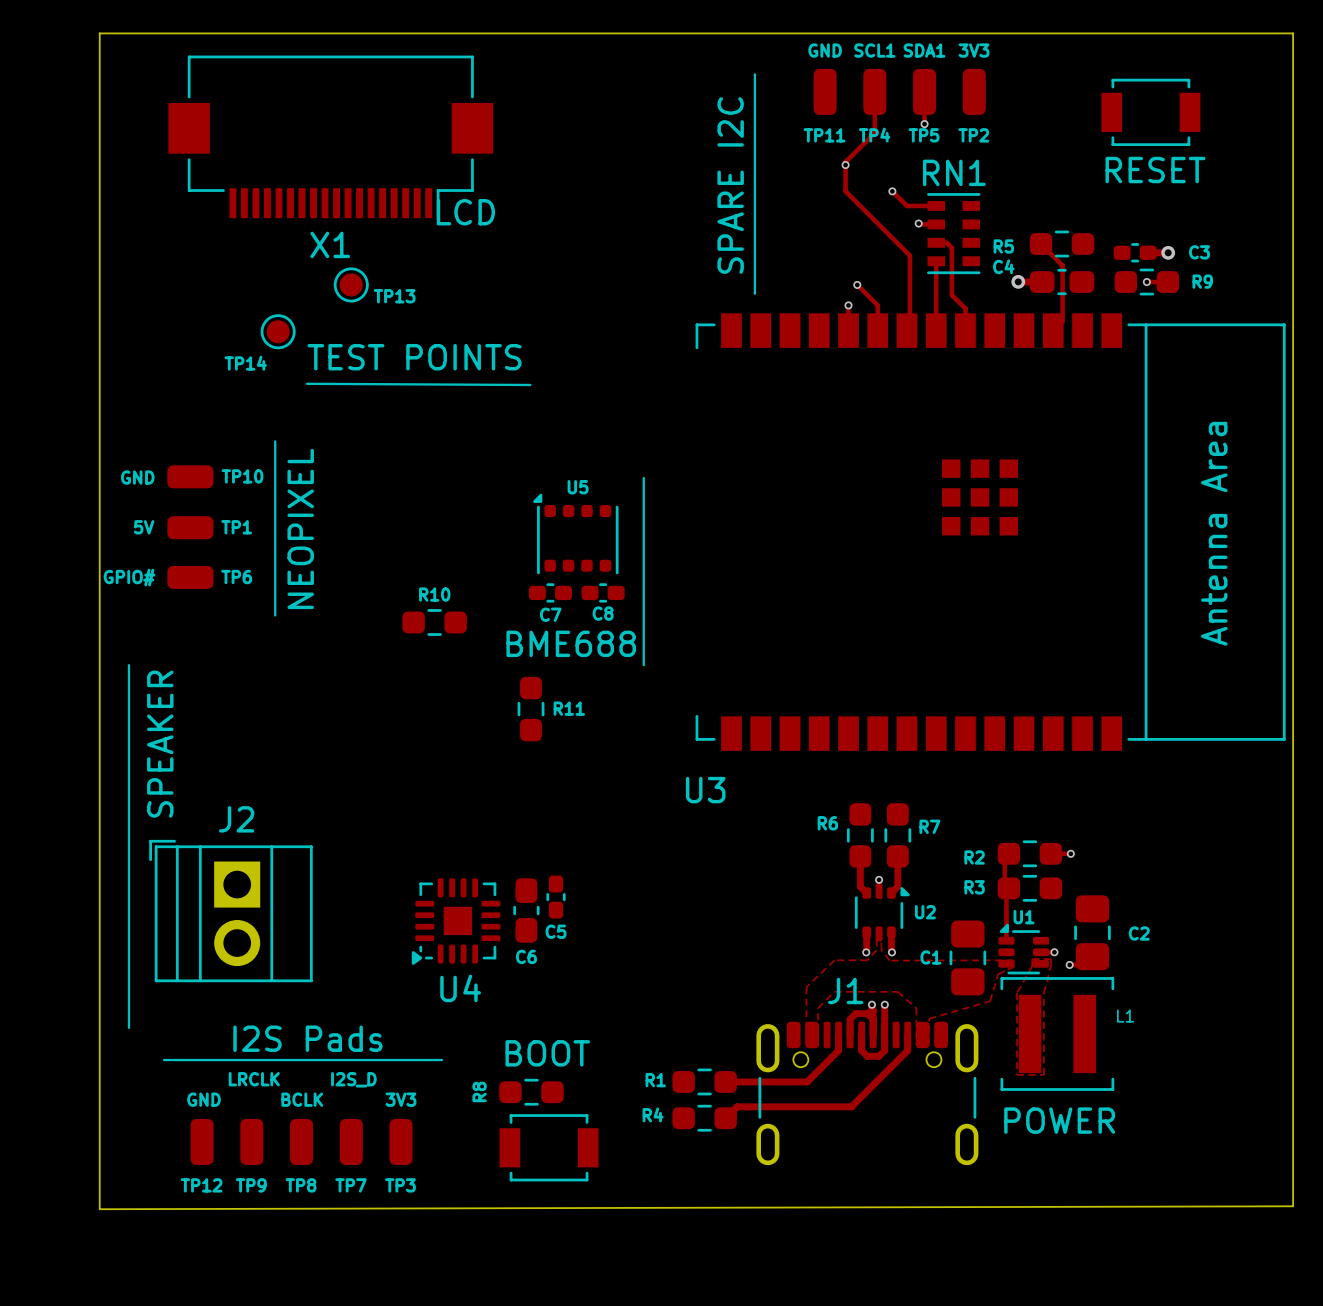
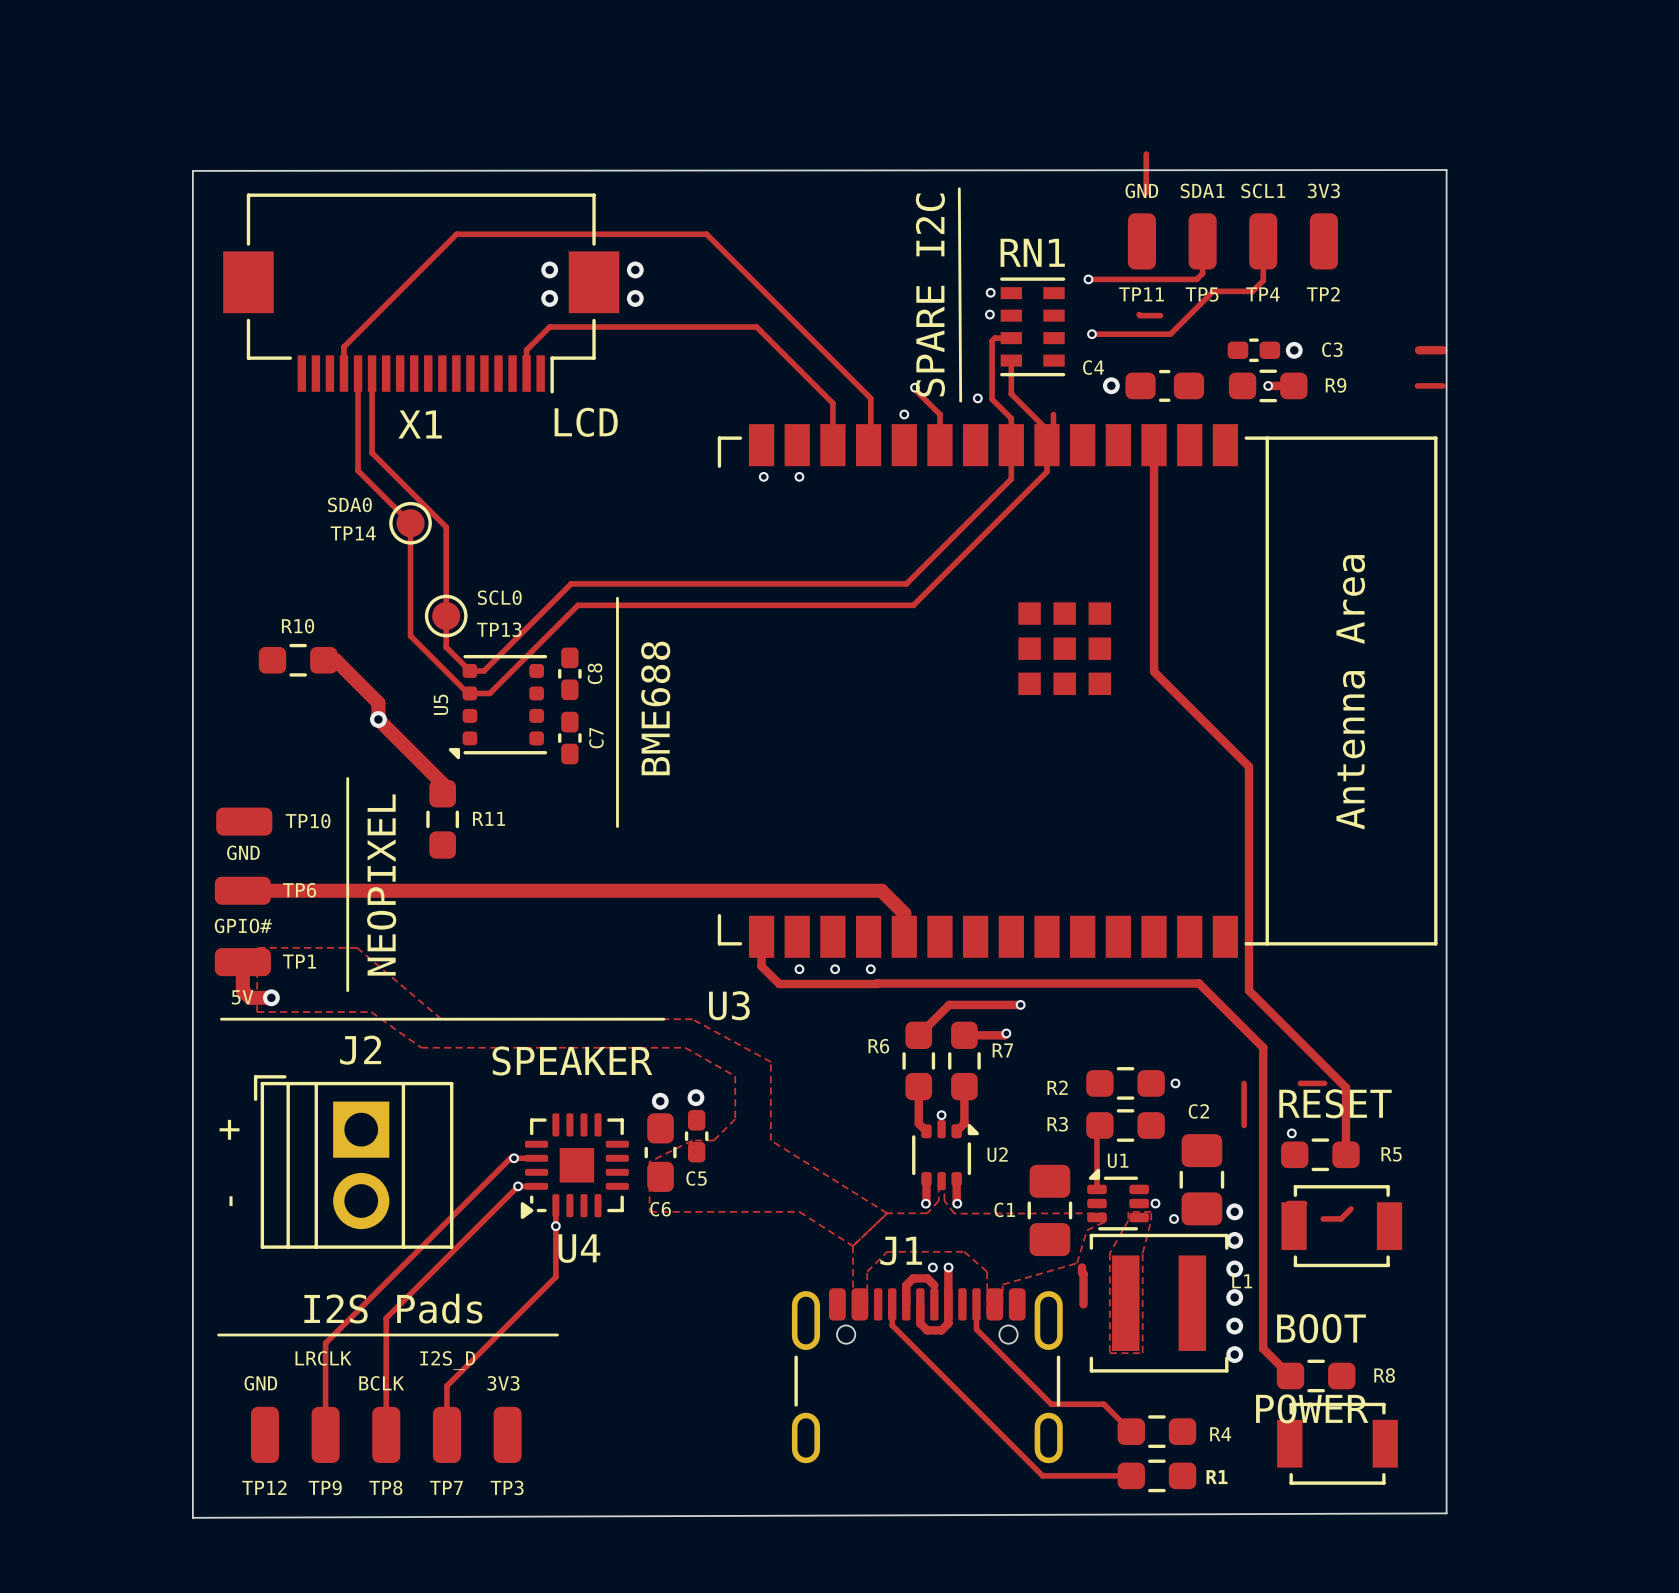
board edge: (99, 33) (1293, 33) (1293, 1206) (99, 1209) (99, 33) -> (1446, 170) (192, 170) (192, 1517) (1446, 1513) (1446, 170)
text position: GND (825, 50) -> GND (1141, 190)
text position: SCL1 (874, 50) -> SCL1 (1263, 190)
text position: SDA1 (924, 50) -> SDA1 (1202, 190)
text position: 3V3 (974, 50) -> 3V3 (1323, 190)
line: (754, 74) (754, 293) -> none
TP11 position: (825, 91) -> (1141, 241)
track: (874, 91) (874, 132) (845, 162) (845, 191) (909, 255) (909, 327) (907, 330) -> none
TP4 position: (874, 91) -> (1263, 241)
TP5 position: (924, 91) -> (1202, 241)
TP2 position: (974, 91) -> (1323, 241)
part: (1150, 112) -> none
line: none -> (959, 188) (960, 401)
via: (924, 124) -> none
X1 position: (330, 137) -> (421, 293)
track: none -> (1202, 241) (1202, 273) (1196, 279) (1088, 279)
track: none -> (1263, 241) (1263, 280) (1252, 291) (1213, 291) (1170, 334) (1092, 334)
via: (845, 165) -> none
text: RESET (1155, 170) -> none
text position: SPARE I2C (730, 185) -> SPARE I2C (930, 295)
via: none -> (549, 269)
via: none -> (635, 269)
track: (892, 191) (907, 205) (936, 205) -> none
via position: (892, 191) -> (1088, 279)
via: none -> (990, 292)
via: none -> (549, 298)
via: none -> (635, 298)
text position: LCD (465, 212) -> LCD (586, 422)
via: none -> (989, 314)
via: (918, 223) -> none
RN1 position: (953, 233) -> (1032, 326)
via: none -> (1092, 334)
track: none -> (1011, 338) (995, 338) (992, 341) (992, 399) (1011, 418) (1011, 479) (906, 583) (571, 583) (484, 670) (469, 670) (446, 647) (446, 527) (372, 453) (372, 373)
track: (936, 242) (946, 242) (951, 247) (951, 295) (965, 308) (965, 330) -> none
track: (1041, 244) (1062, 265) (1062, 321) (1053, 330) -> none
R5 position: (1062, 244) -> (1320, 1154)
R5 name position: R5 (1003, 246) -> R5 (1391, 1154)
C3 position: (1135, 252) -> (1253, 350)
via: (1168, 252) -> none
track: none -> (1011, 360) (1011, 394) (1047, 429) (1047, 471) (913, 605) (577, 605) (489, 693) (468, 693) (410, 635) (410, 523) (358, 470) (358, 373)
track: (936, 261) (936, 330) -> none
track: none -> (343, 373) (343, 346) (456, 234) (706, 234) (870, 398) (870, 442) (868, 445)
track: none -> (526, 373) (526, 350) (549, 327) (756, 327) (832, 403) (832, 445)
via: none -> (1111, 385)
via position: (1018, 281) -> (1294, 350)
via: none -> (1268, 385)
C4 position: (1062, 282) -> (1164, 385)
R9 position: (1146, 282) -> (1268, 385)
via: (1146, 282) -> none
via: none -> (914, 387)
TP13 position: (351, 284) -> (446, 616)
track: (857, 284) (877, 305) (877, 330) -> (914, 389) (939, 414) (939, 445)
via: (857, 284) -> none
via: none -> (977, 398)
via: none -> (904, 414)
via: (848, 305) -> none
track: none -> (1154, 445) (1154, 671) (1248, 766) (1248, 990) (1345, 1087) (1345, 1154)
TP14 position: (278, 331) -> (410, 523)
via: none -> (763, 476)
via: none -> (799, 476)
text: TEST POINTS (414, 357) -> none
TP14 name position: TP14 (245, 363) -> TP14 (353, 533)
text: none -> SDA0 (349, 504)
line: (306, 383) (530, 384) -> none
line: (275, 441) (275, 615) -> (347, 778) (347, 990)
text: none -> SCL0 (499, 597)
TP10 position: (190, 476) -> (244, 821)
text position: GND (137, 477) -> GND (243, 852)
line: (643, 477) (643, 665) -> (617, 598) (617, 826)
track: none -> (323, 660) (335, 660) (378, 702) (378, 719) (442, 783) (442, 793)
text position: 5V (144, 527) -> 5V (242, 997)
TP1 position: (190, 527) -> (242, 962)
text position: NEOPIXEL (300, 528) -> NEOPIXEL (381, 885)
U3 position: (990, 532) -> (1077, 690)
U5 rotation: 0° (575, 534) -> 90° counterclockwise (497, 707)
U5 position: (575, 534) -> (497, 707)
via: none -> (378, 719)
text position: GPIO# (129, 577) -> GPIO# (243, 925)
TP6 position: (190, 577) -> (242, 890)
C7 rotation: 0° (550, 592) -> 90° clockwise (569, 738)
C7 position: (550, 592) -> (569, 738)
C8 rotation: 0° (603, 592) -> 90° clockwise (569, 673)
C8 position: (603, 592) -> (569, 673)
R10 position: (434, 622) -> (298, 660)
text rotation: 0° (571, 643) -> 90° counterclockwise (655, 708)
line: (128, 665) (128, 1027) -> none
track: none -> (242, 890) (881, 890) (904, 913) (904, 936)
R11 position: (531, 709) -> (442, 819)
track: none -> (761, 936) (761, 966) (779, 983) (1199, 983) (1263, 1047) (1263, 1348) (1290, 1375)
text rotation: 0° (160, 744) -> 90° clockwise (572, 1060)
text position: SPEAKER (160, 744) -> SPEAKER (572, 1060)
track: none -> (242, 962) (242, 990) (249, 997) (271, 997)
via: none -> (799, 969)
via: none -> (835, 969)
via: none -> (870, 969)
via: none -> (271, 997)
track: none -> (1020, 1004) (949, 1004) (918, 1035)
via: none -> (1020, 1004)
line: none -> (221, 1019) (663, 1019)
track: none -> (1006, 1033) (1004, 1035) (964, 1035)
via: none -> (1006, 1033)
R6 position: (860, 835) -> (918, 1060)
R7 position: (897, 835) -> (964, 1060)
via: none -> (1175, 1083)
R2 position: (1029, 853) -> (1125, 1083)
via: (1070, 853) -> none
track: (860, 856) (860, 886) (866, 893) -> (918, 1086) (918, 1123) (926, 1131)
track: (897, 856) (897, 886) (891, 893) -> (964, 1086) (964, 1123) (956, 1131)
via: none -> (695, 1097)
via: none -> (660, 1101)
text: none -> RESET (1335, 1103)
via: none -> (941, 1115)
via: (879, 879) -> none
track: (1008, 888) (1006, 890) (1006, 940) -> (1099, 1125) (1097, 1128) (1097, 1189)
R3 position: (1029, 888) -> (1125, 1125)
text: none -> + (229, 1129)
via: none -> (1291, 1133)
J2 position: (230, 911) -> (353, 1161)
U2 position: (882, 912) -> (945, 1155)
via: none -> (514, 1158)
track: none -> (536, 1158) (510, 1158) (325, 1343) (325, 1434)
zone outline: (876, 927) (881, 927) (881, 950) (889, 960) (1013, 960) (1013, 967) (998, 974) (990, 1001) (929, 1018) (928, 1044) (916, 1044) (916, 1008) (897, 991) (834, 991) (818, 1008) (818, 1043) (806, 1043) (806, 987) (834, 960) (867, 960) (876, 950) (876, 927) -> none
track: (866, 932) (866, 952) -> (926, 1179) (925, 1203)
track: (891, 932) (891, 952) -> (956, 1179) (957, 1203)
C2 position: (1092, 932) -> (1201, 1179)
C2 name position: C2 (1139, 933) -> C2 (1198, 1111)
via: none -> (518, 1186)
track: none -> (536, 1186) (518, 1186) (386, 1318) (386, 1434)
U1 position: (1023, 949) -> (1118, 1199)
text: none -> - (231, 1201)
via: none -> (925, 1203)
via: none -> (957, 1203)
via: (866, 952) -> none
via: (891, 952) -> none
via: none -> (1155, 1203)
via: (1054, 952) -> none
track: none -> (555, 1205) (555, 1277) (446, 1385) (446, 1434)
C1 position: (967, 957) -> (1049, 1210)
via: none -> (1234, 1211)
zone outline: (1032, 959) (1050, 959) (1043, 993) (1043, 1074) (1017, 1074) (1017, 993) (1032, 966) (1032, 959) -> (1128, 1211) (1151, 1211) (1151, 1220) (1142, 1253) (1142, 1353) (1109, 1353) (1109, 1253) (1128, 1220) (1128, 1211)
zone outline: none -> (887, 1213) (852, 1246)
zone outline: none -> (887, 1213) (770, 1140) (770, 1062) (692, 1019) (441, 1019) (357, 947) (257, 947) (257, 1012) (371, 1012) (421, 1047) (685, 1047) (735, 1076) (735, 1119) (713, 1140) (692, 1140) (649, 1161) (649, 1211) (799, 1211) (852, 1246)
zone outline: none -> (887, 1213) (927, 1213) (938, 1200) (938, 1173) (944, 1173) (944, 1200) (954, 1213) (1105, 1213) (1105, 1221) (1087, 1230) (1077, 1263) (1002, 1284) (1002, 1316) (987, 1316) (987, 1271) (964, 1251) (887, 1251) (867, 1271) (867, 1314) (852, 1314) (852, 1246)
via: none -> (1174, 1218)
via: (1069, 964) -> none
via: none -> (555, 1226)
part: none -> (1341, 1226)
via: none -> (1234, 1240)
via: none -> (932, 1267)
via: none -> (948, 1267)
via: (871, 1004) -> none
track: (884, 1004) (884, 1050) (878, 1056) (867, 1056) (861, 1050) (861, 1034) -> (948, 1267) (948, 1323) (941, 1330) (927, 1330) (920, 1323) (920, 1304)
via: (884, 1004) -> none
via: none -> (1234, 1268)
track: (873, 1019) (867, 1013) (855, 1013) (850, 1019) (850, 1034) -> (934, 1285) (927, 1278) (913, 1278) (906, 1285) (906, 1304)
via: none -> (1234, 1297)
L1 position: (1057, 1033) -> (1159, 1303)
track: none -> (892, 1304) (892, 1325) (1042, 1475) (1131, 1475)
track: none -> (976, 1304) (976, 1329) (1051, 1404) (1103, 1404) (1131, 1431)
track: (838, 1034) (838, 1050) (807, 1081) (725, 1081) -> none
track: (907, 1034) (907, 1050) (851, 1106) (737, 1106) (725, 1118) -> none
via: none -> (1234, 1326)
text position: BOOT (547, 1053) -> BOOT (1321, 1328)
via: none -> (1234, 1354)
R1 name position: R1 (655, 1080) -> R1 (1217, 1477)
R1 position: (704, 1081) -> (1156, 1475)
R8 name rotation: 0° (479, 1091) -> 90° clockwise (1384, 1375)
R8 name position: R8 (479, 1091) -> R8 (1384, 1375)
R8 position: (531, 1092) -> (1316, 1375)
J1 position: (867, 1093) -> (927, 1375)
R4 name position: R4 (653, 1114) -> R4 (1220, 1434)
R4 position: (704, 1118) -> (1156, 1431)
part: (549, 1147) -> none
part: none -> (1337, 1443)

